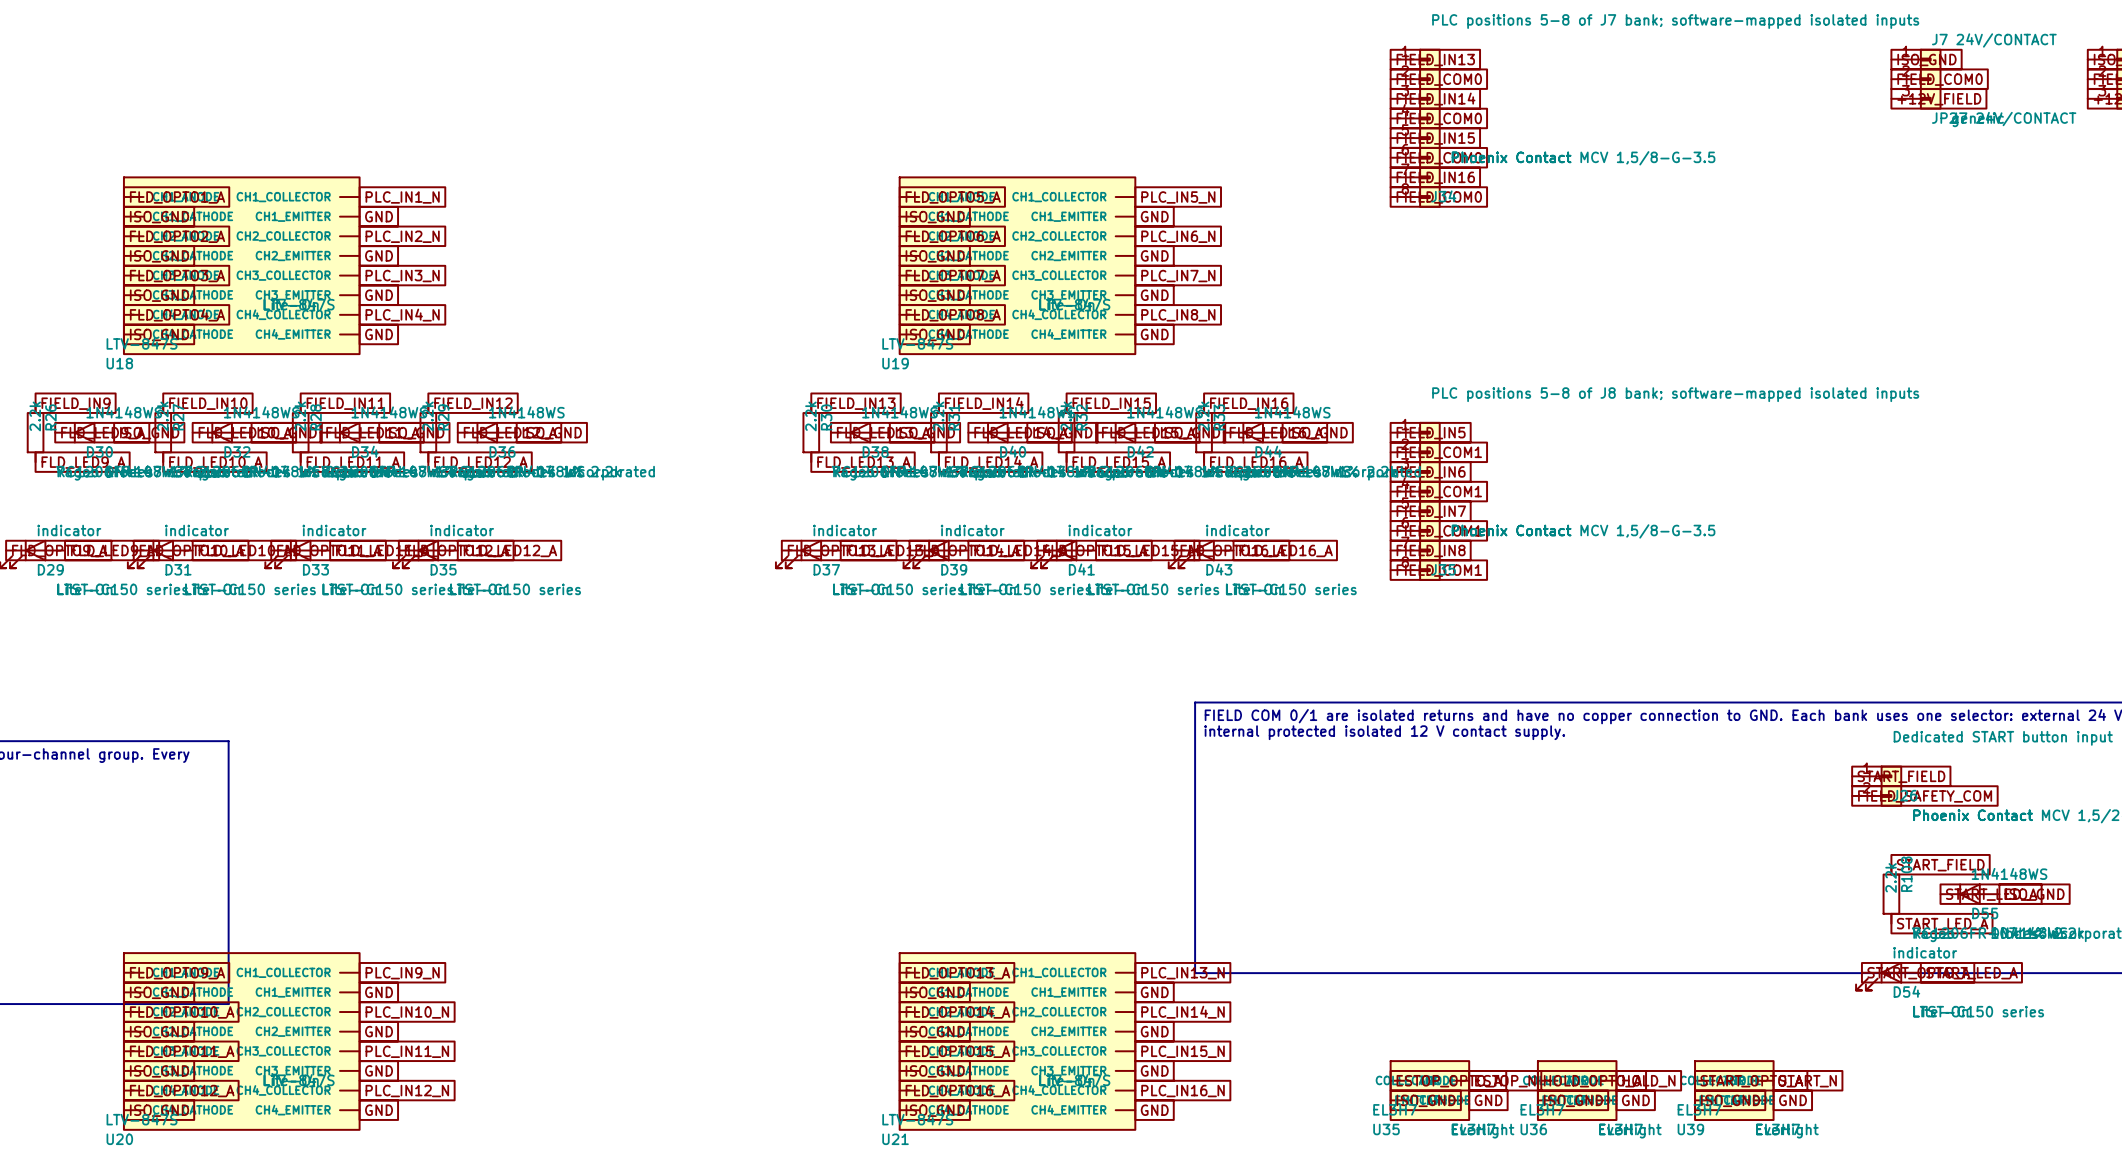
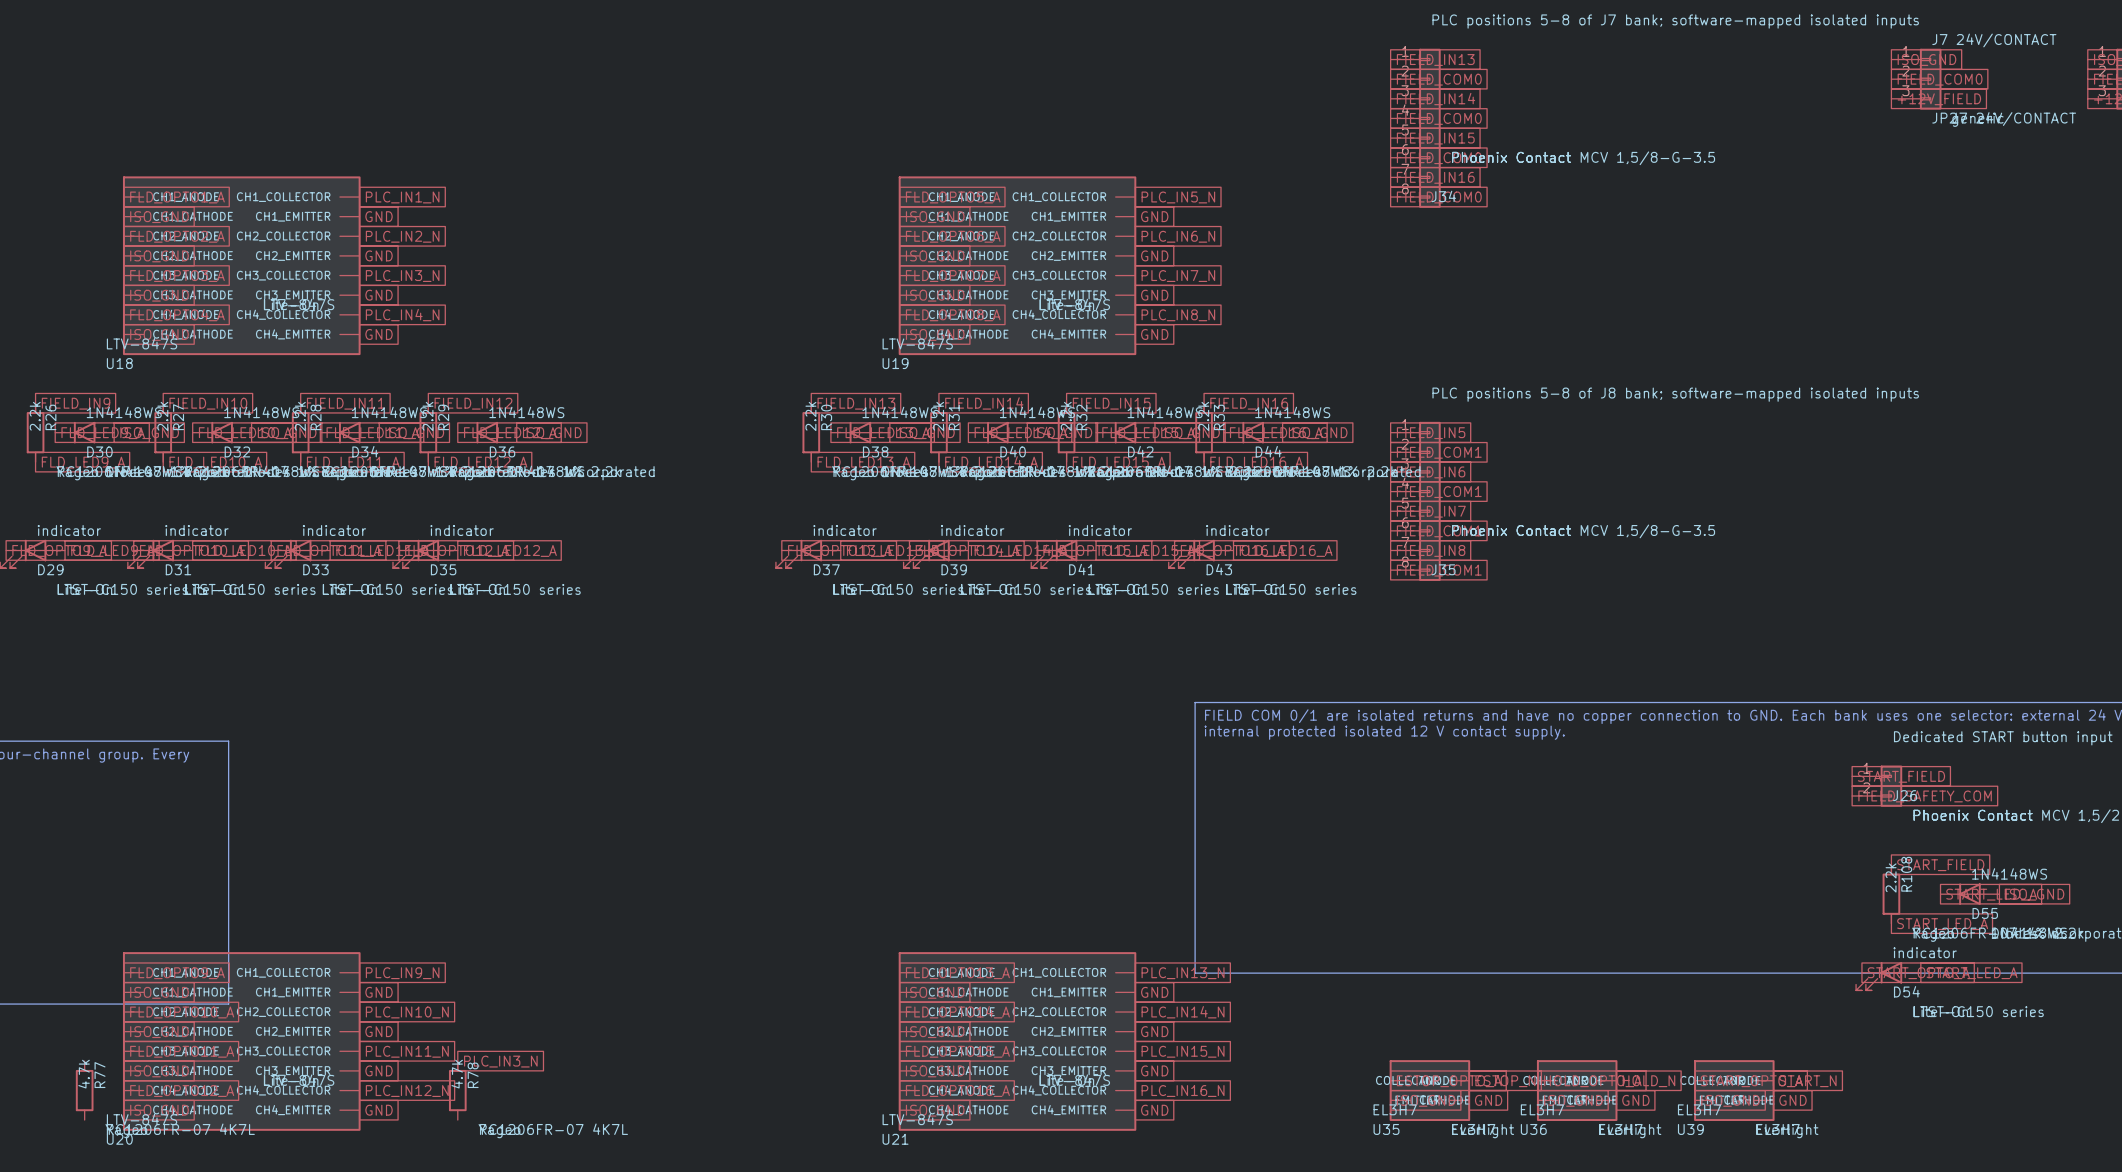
global label: none -> PLC_IN3_N (500, 1061)
R77: none -> 4.7k (84, 1090)
R78: none -> 4.7k (457, 1090)

